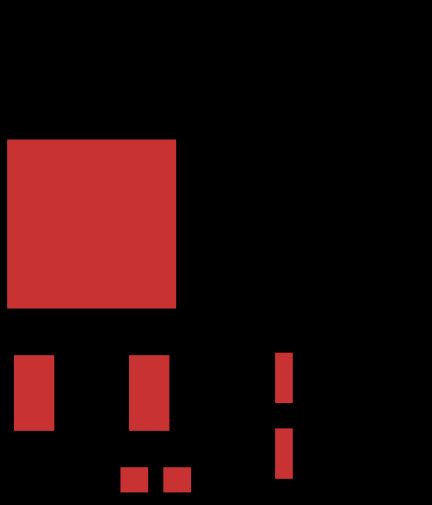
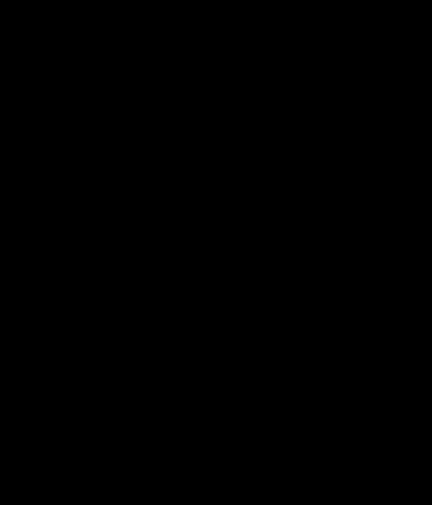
part: (91, 285) -> none
part: (283, 415) -> none
part: (155, 479) -> none

